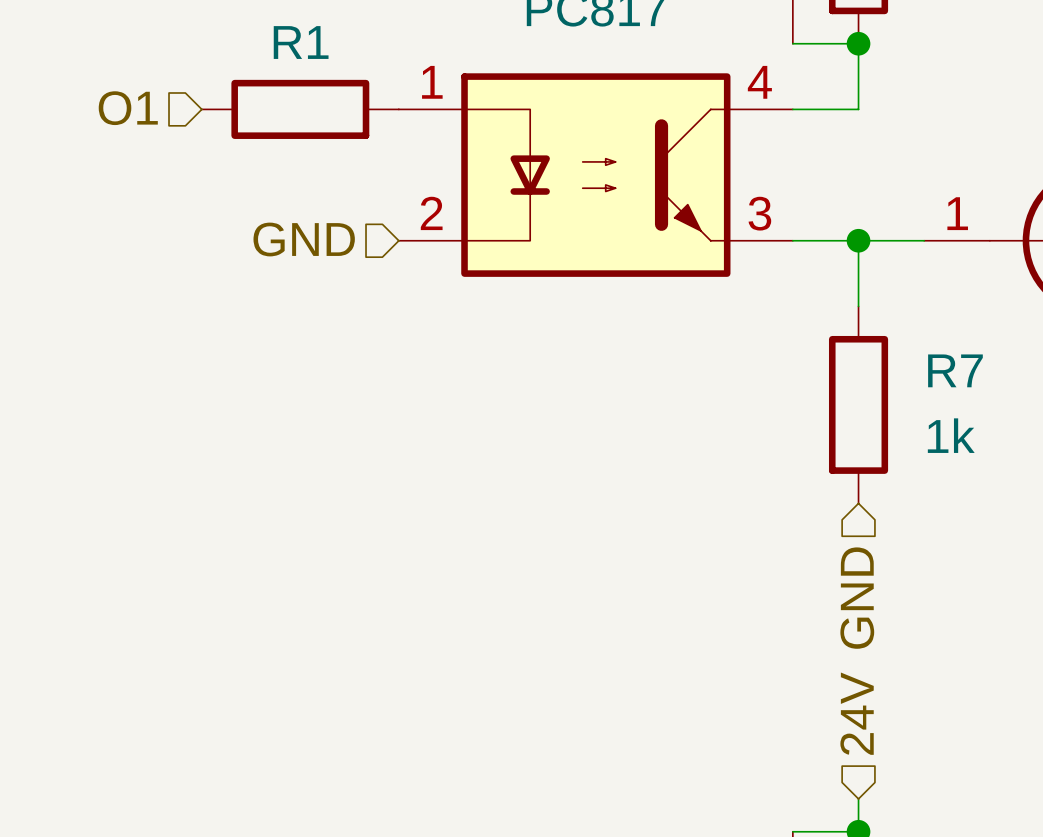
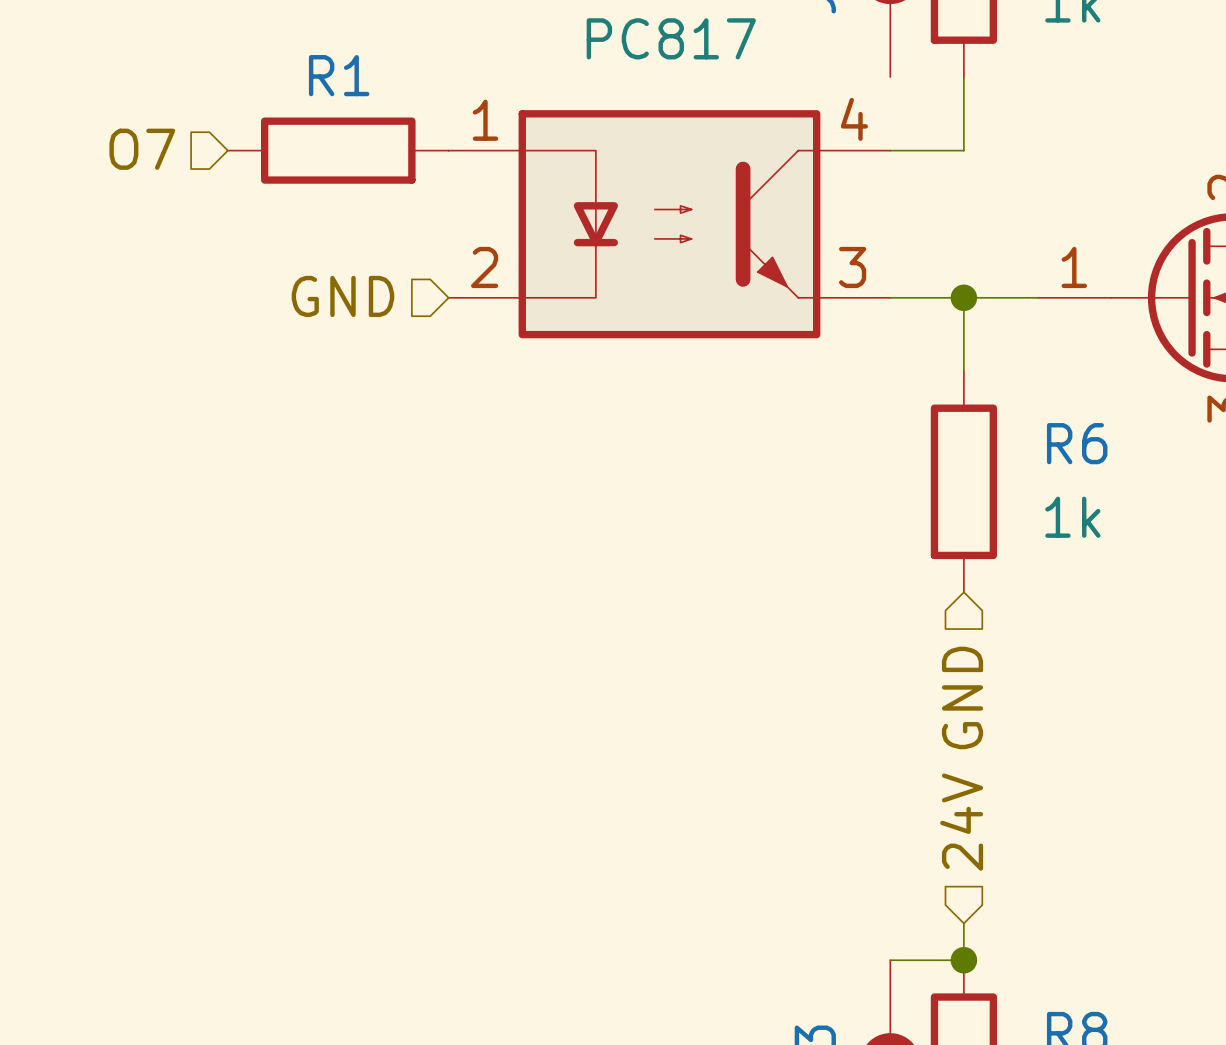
wire: (792, 43) (858, 43) -> none
junction: (858, 43) -> none
hierarchical label: O1 (128, 108) -> O7 (142, 149)
R7 name: R7 (955, 370) -> R6 (1077, 443)

